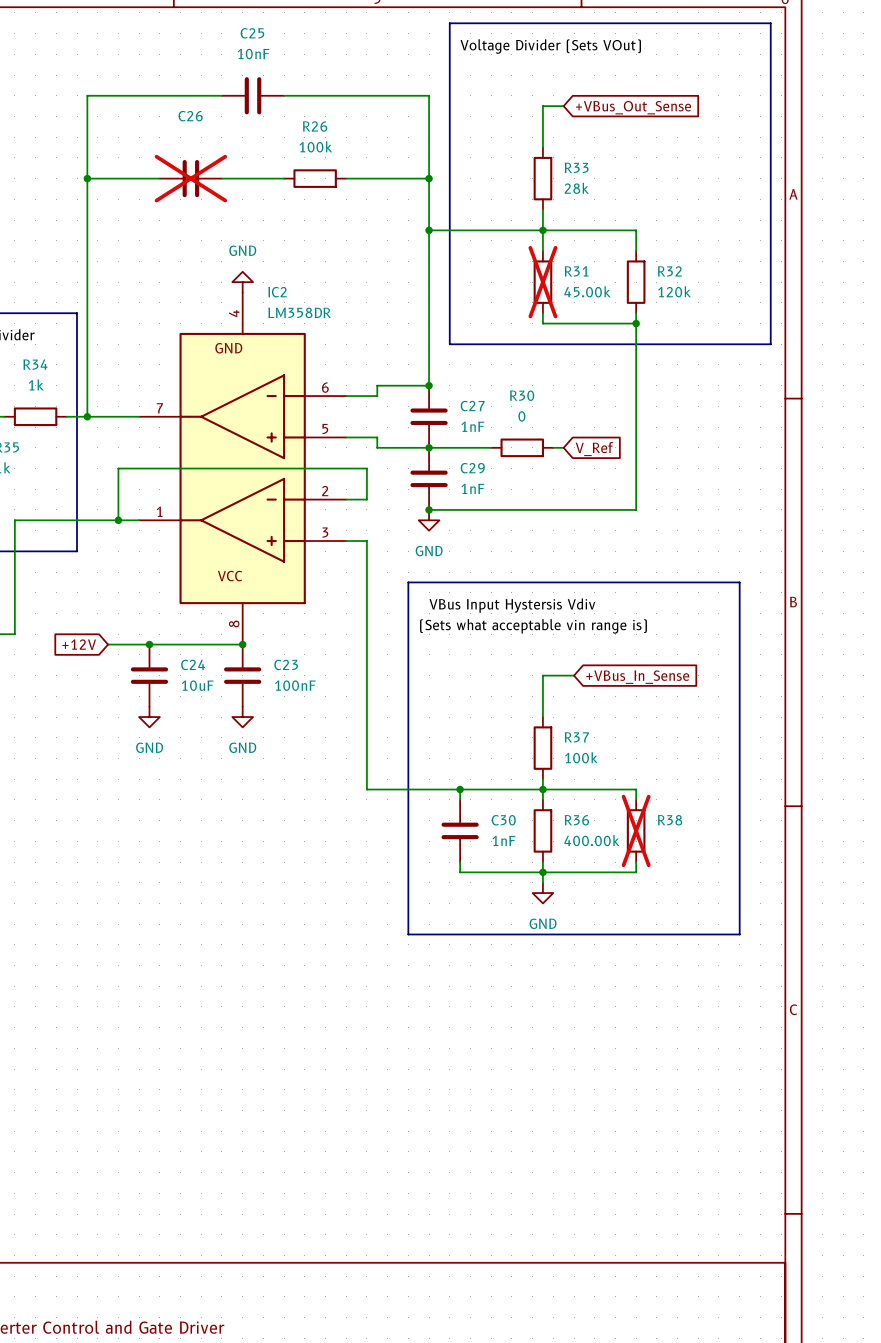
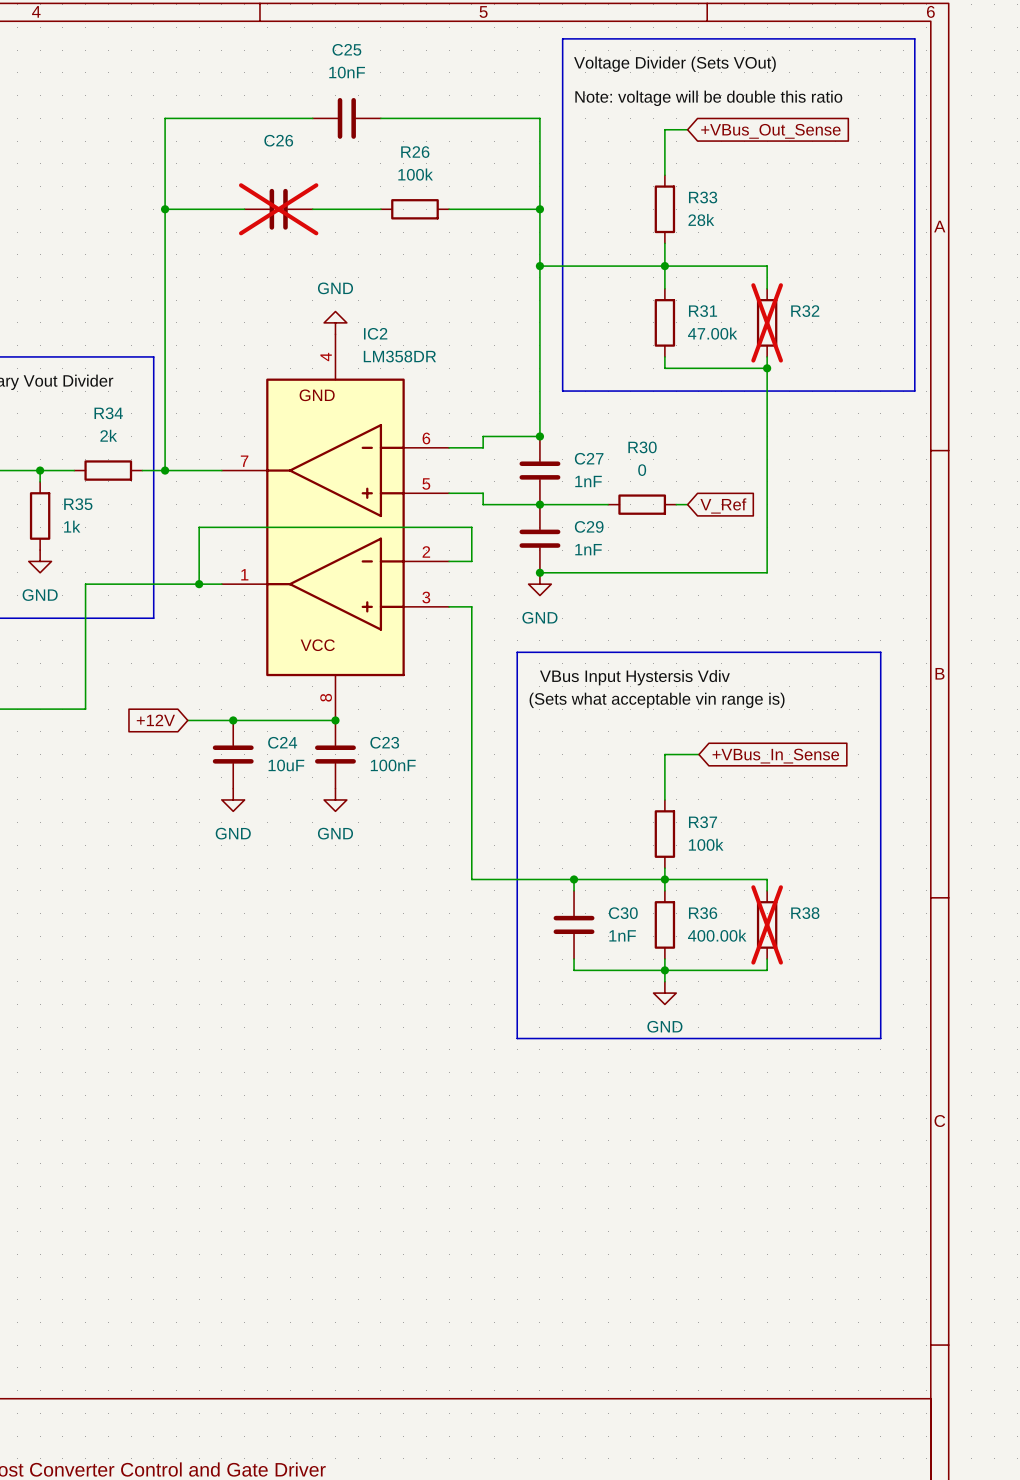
label: none -> Note: voltage will be double this ratio (708, 98)
R31 do-not-place cross: (542, 282) -> none
R32 do-not-place cross: none -> (767, 322)
R31 value: 45.00k (587, 291) -> 47.00k (712, 333)
R32 value: 120k (674, 291) -> none
R34 value: 1k (36, 384) -> 2k (108, 435)

